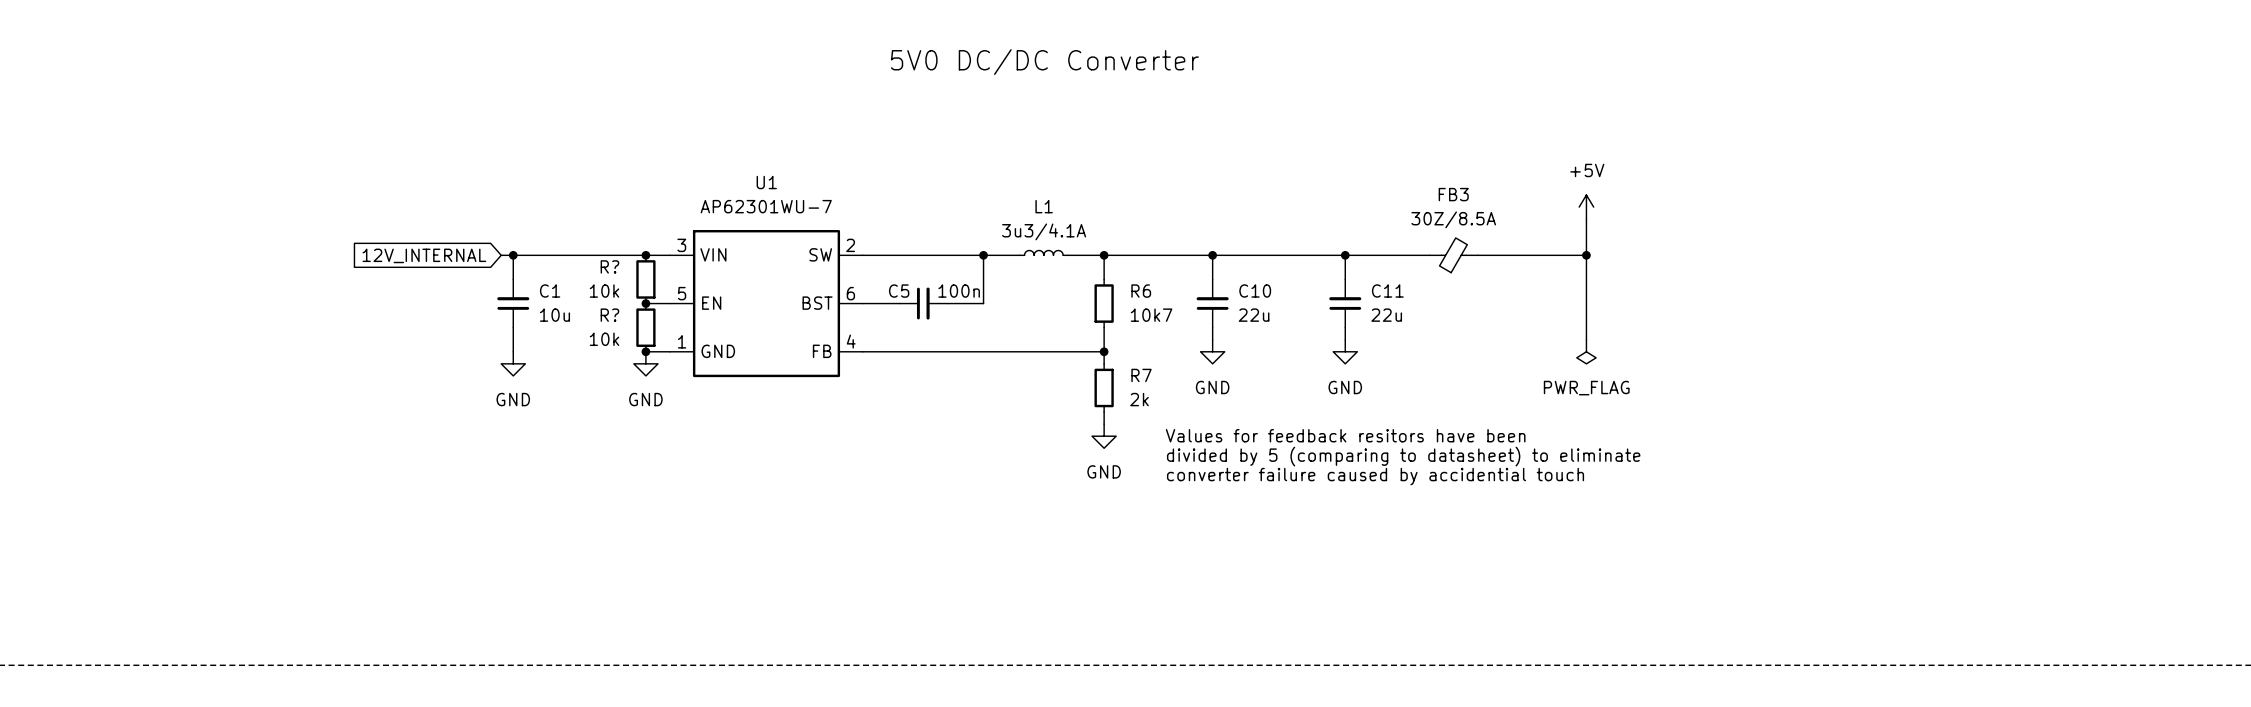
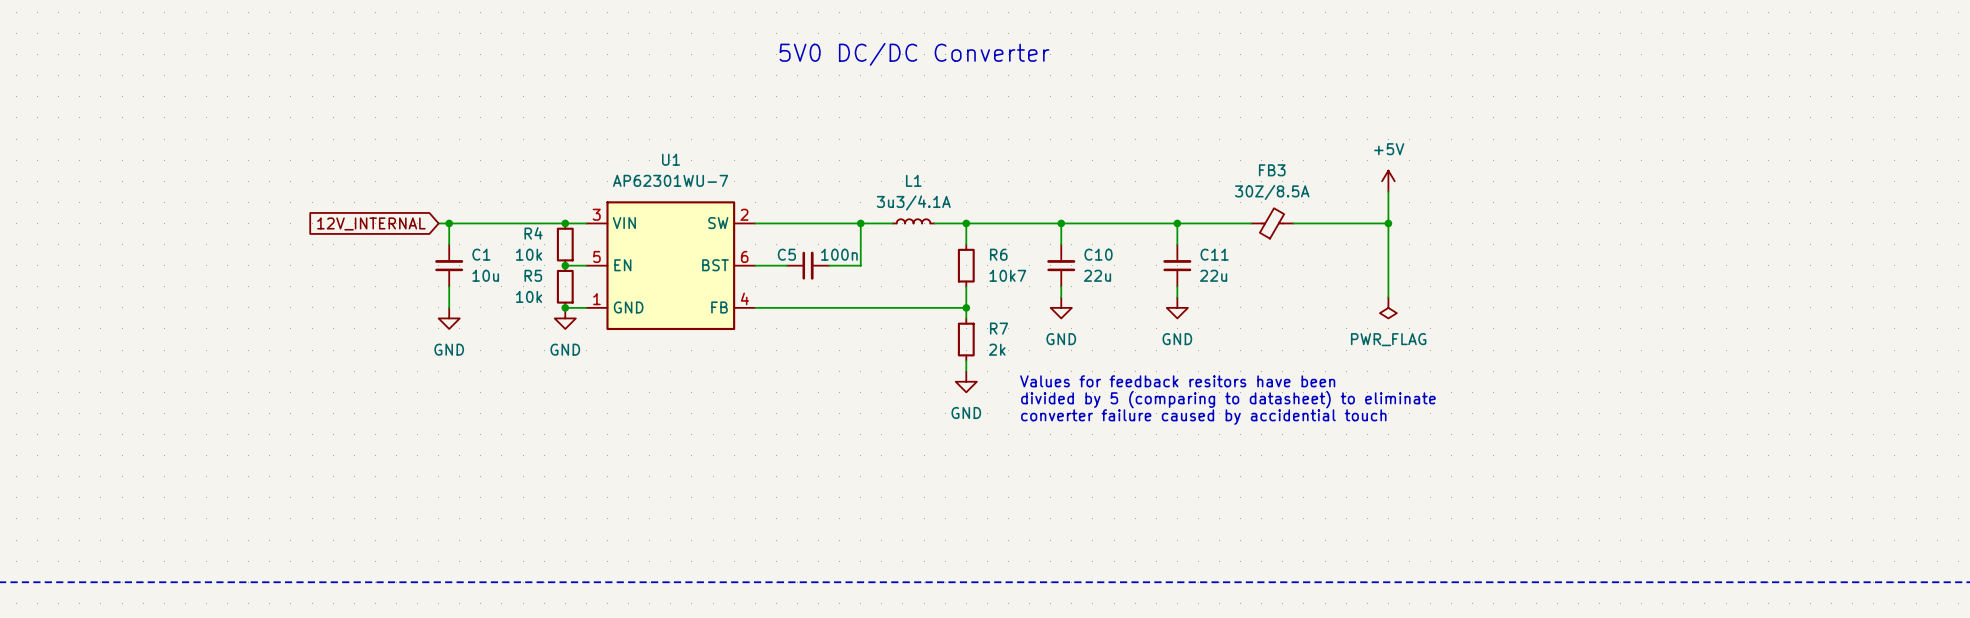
R? name: R? (609, 266) -> R4 (533, 233)
R? name: R? (609, 315) -> R5 (533, 275)

